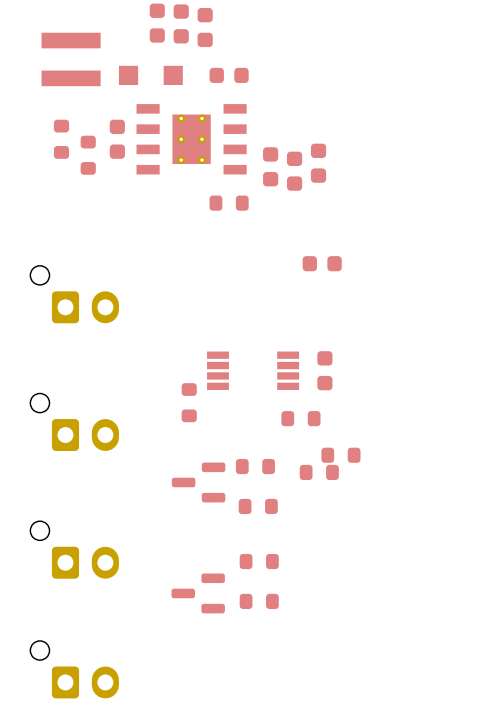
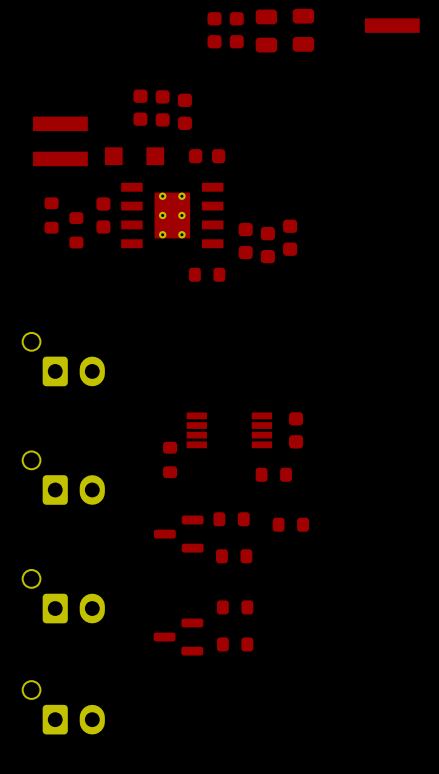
part: (322, 263) -> none
part: (340, 455) -> none

